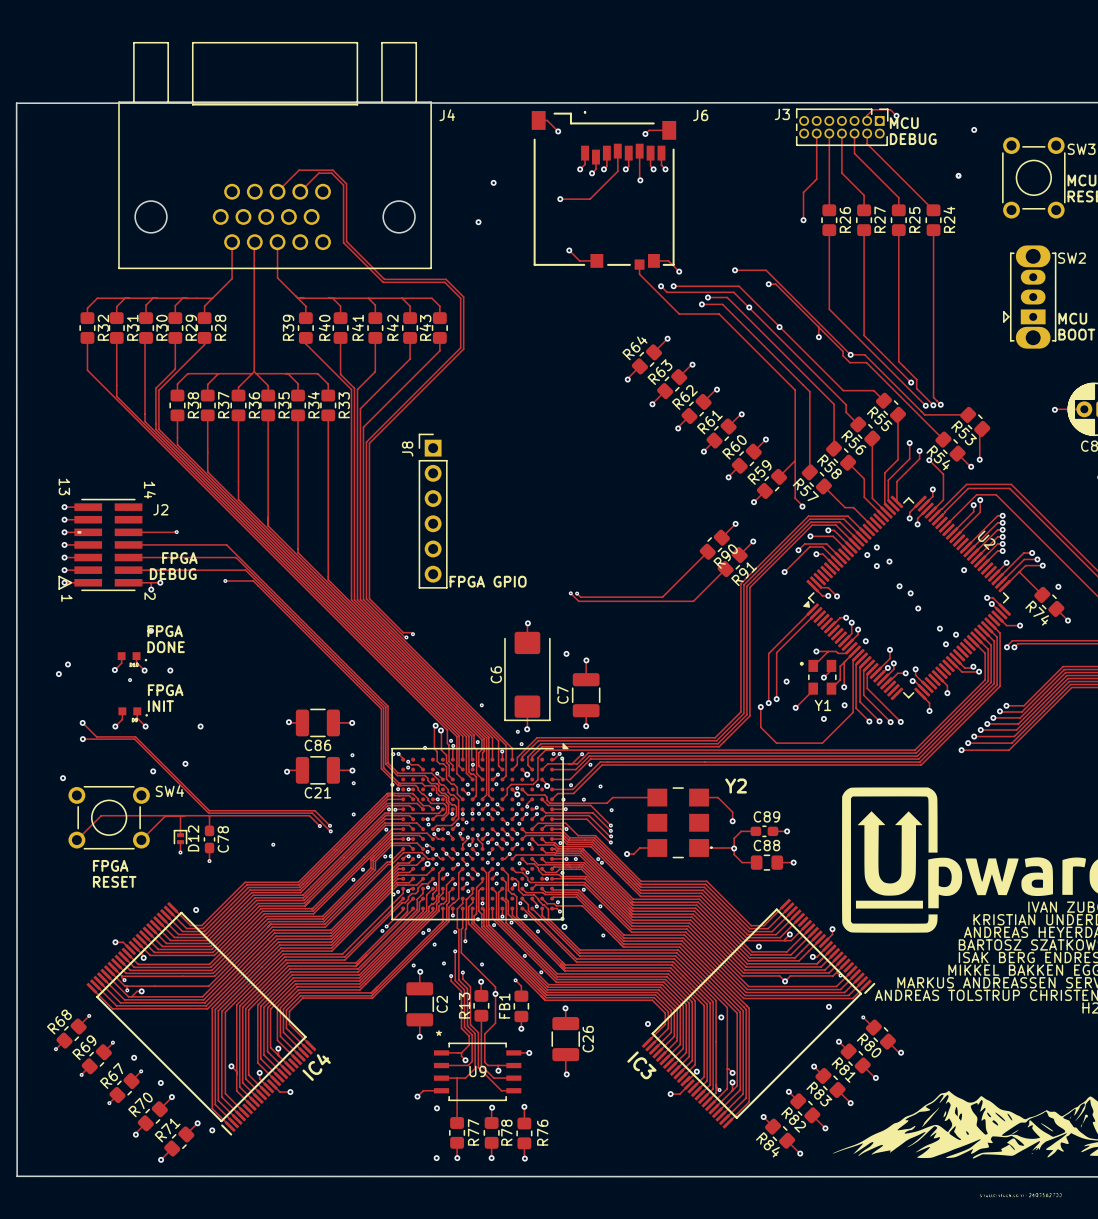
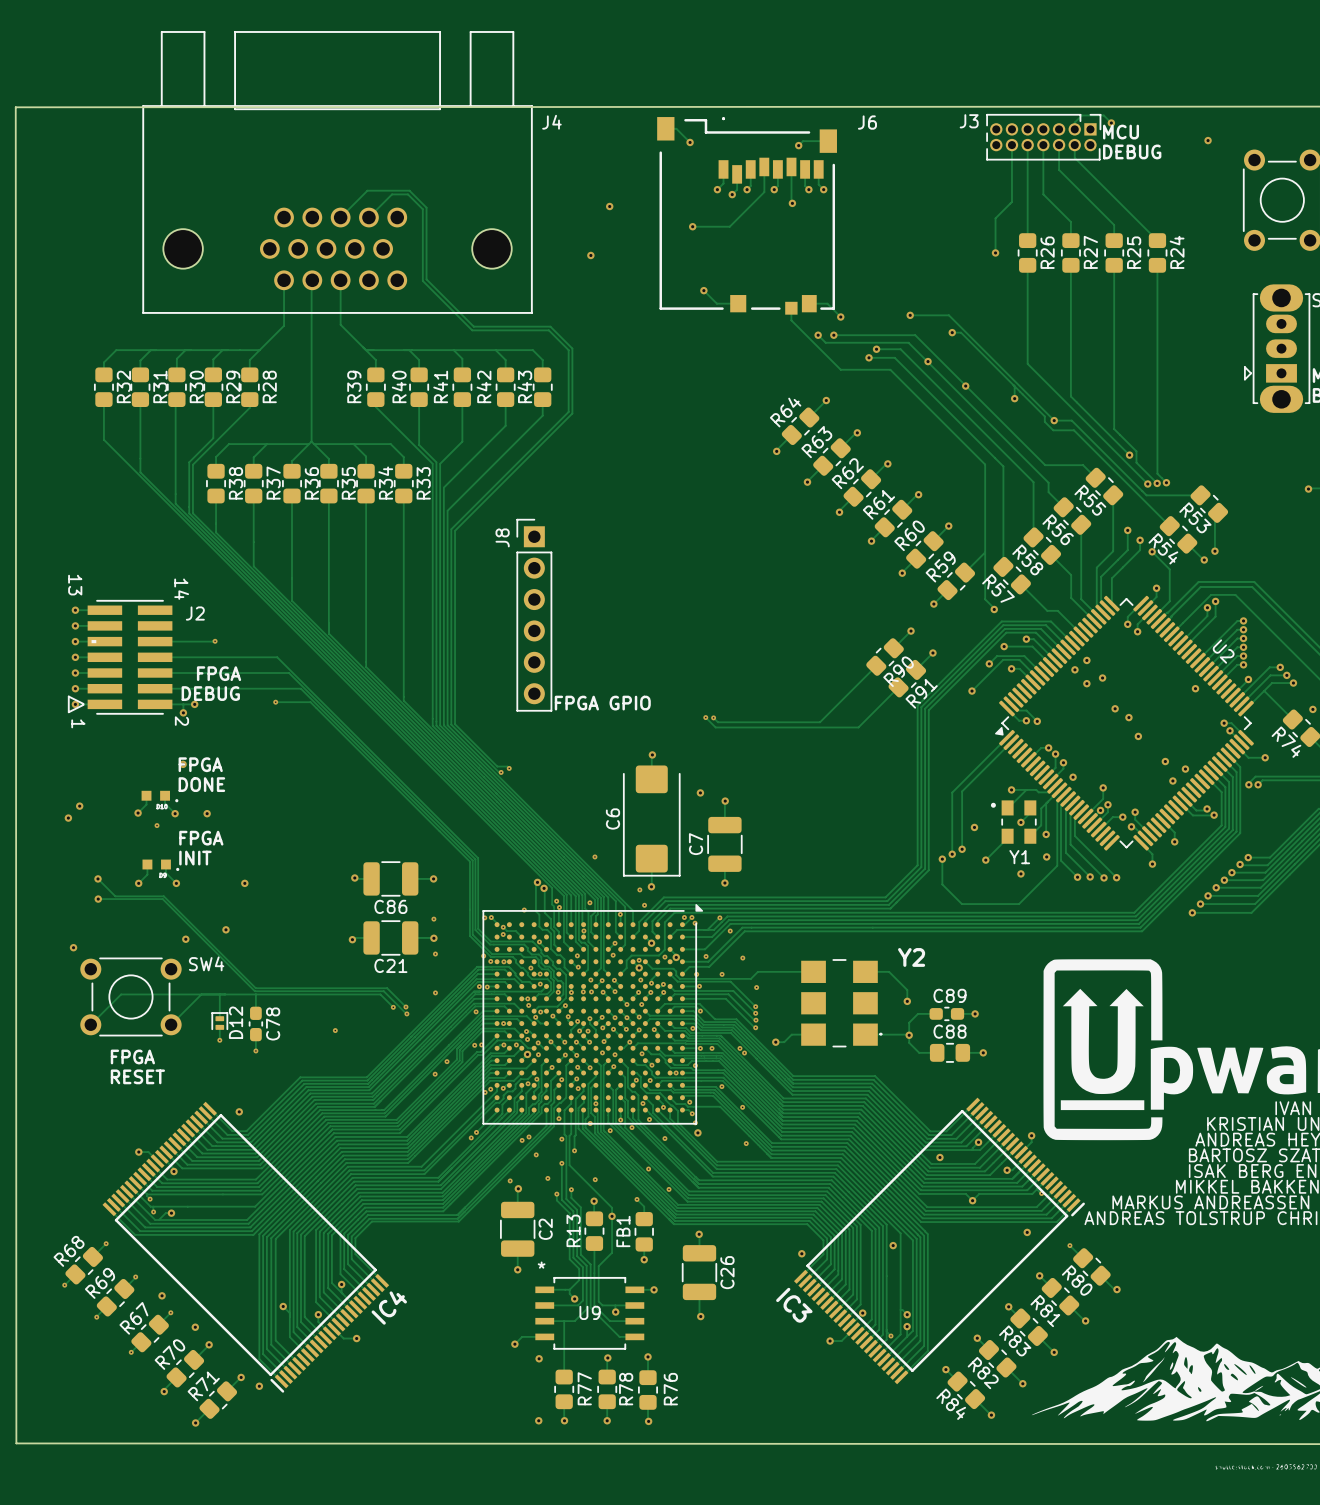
via: (958, 175) -> none
via: (466, 822) -> none
via: (496, 883) -> none

